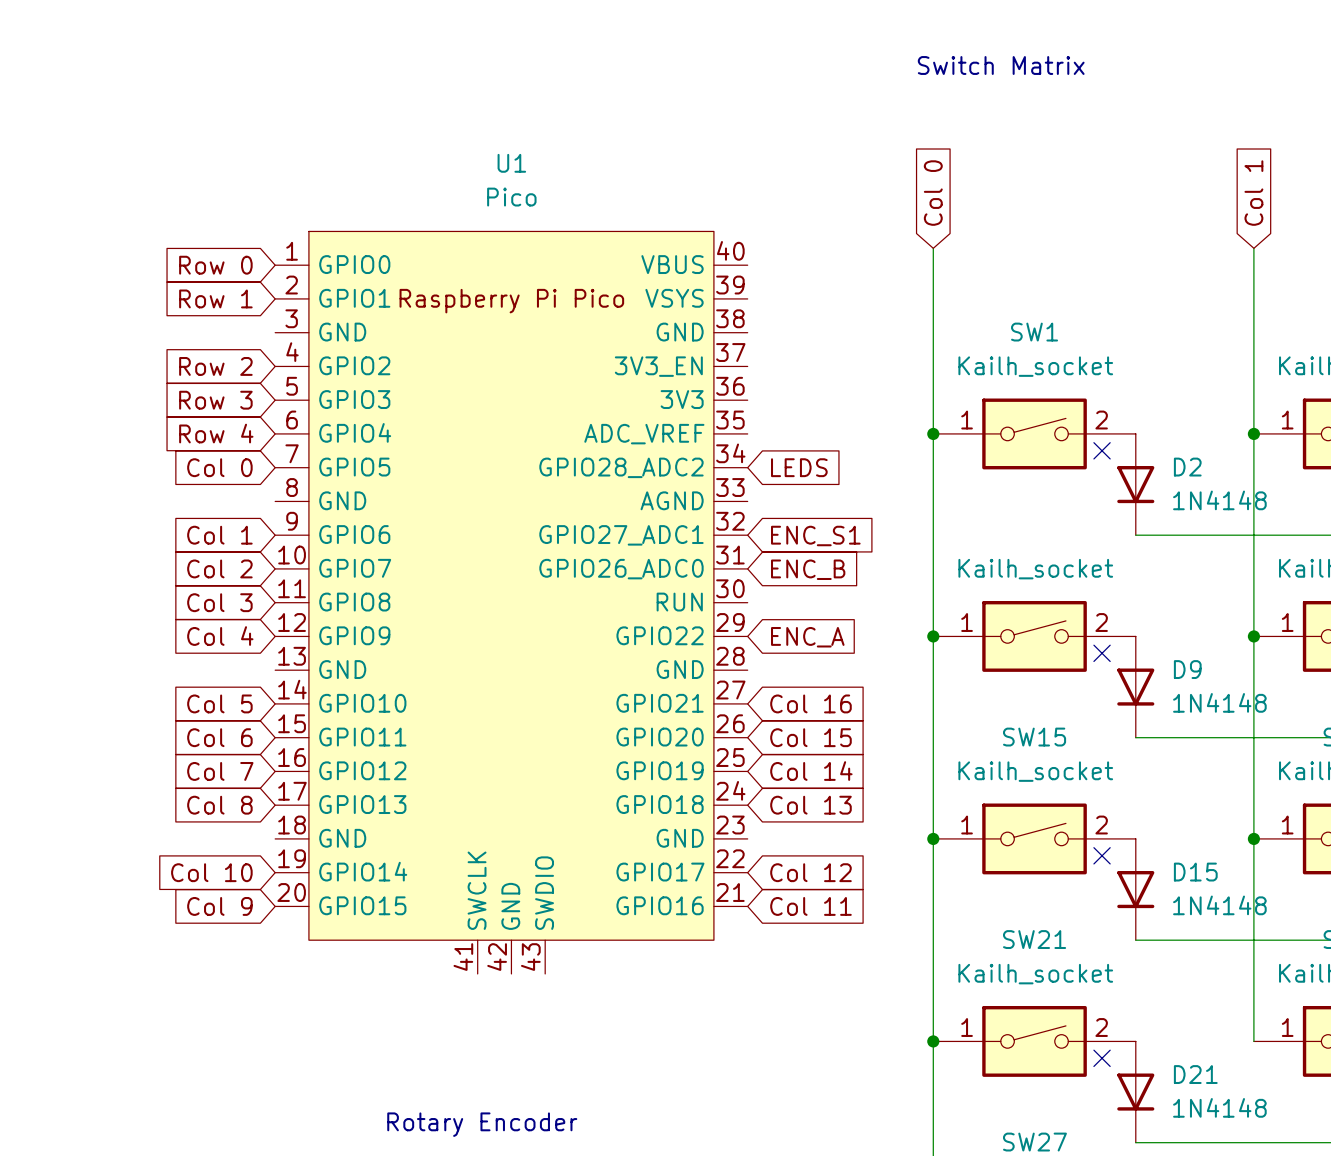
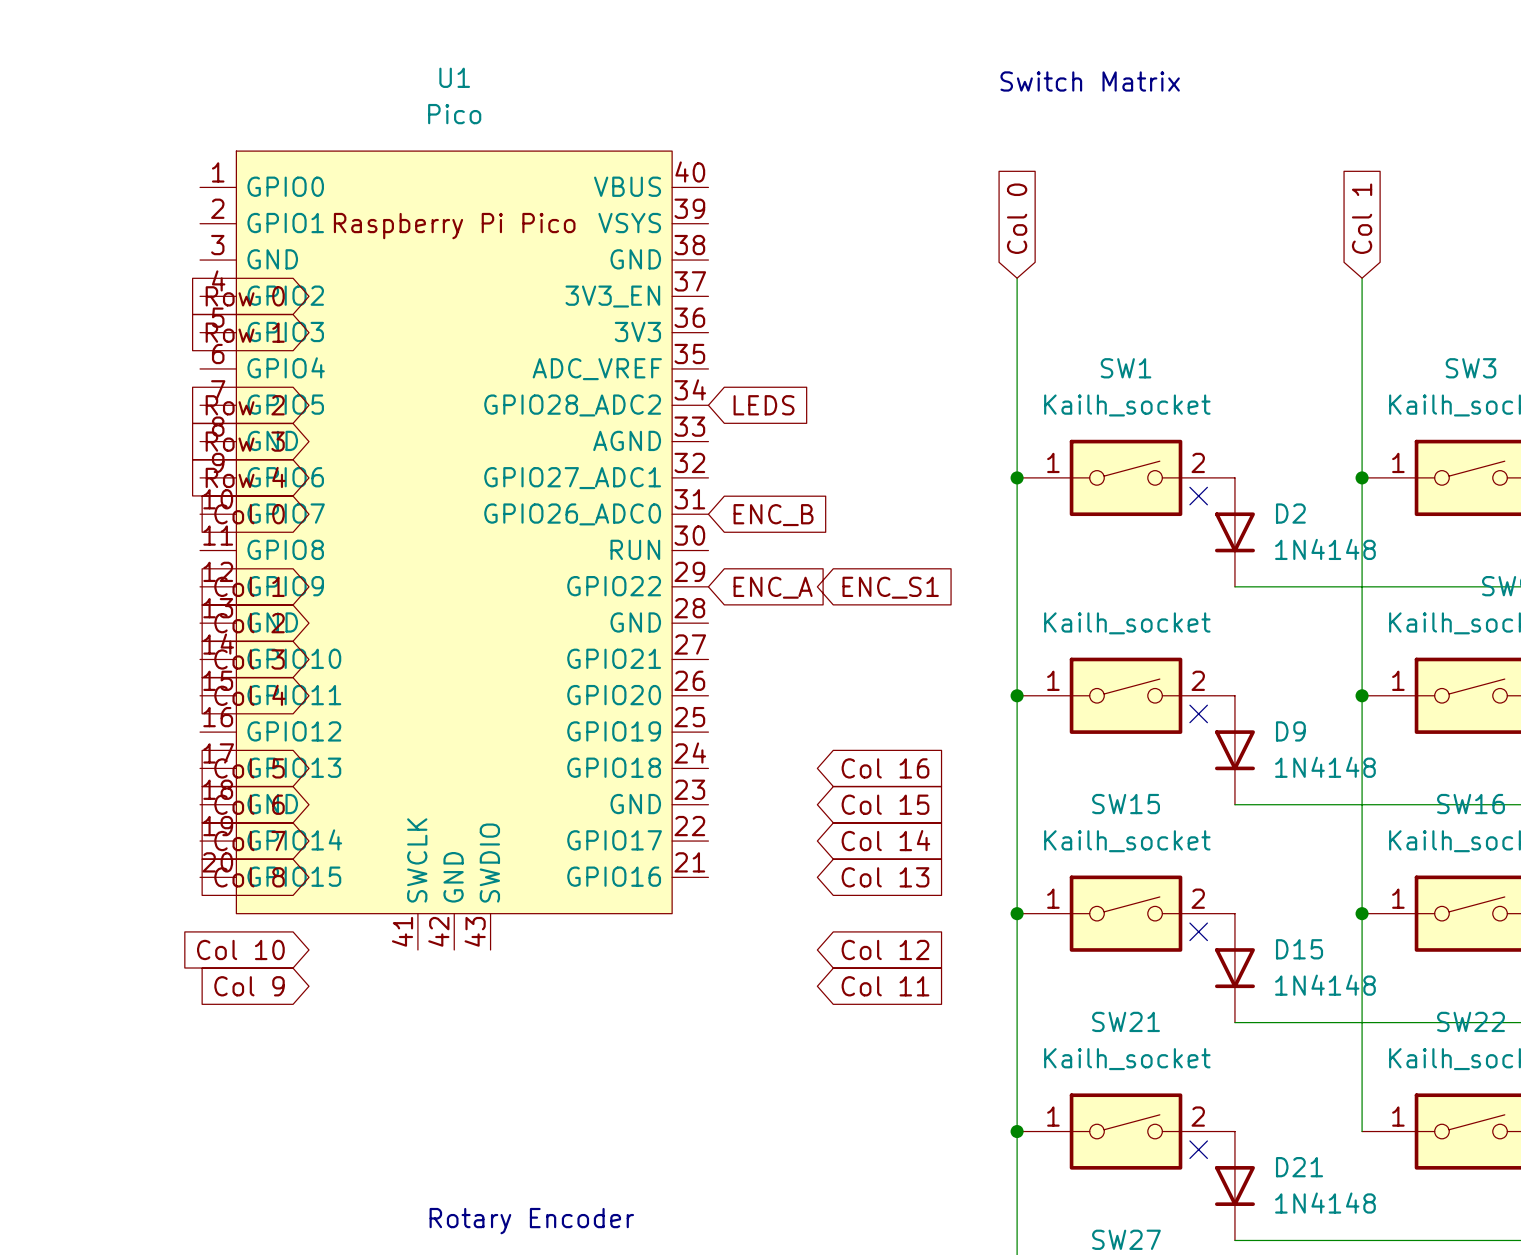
global label position: LEDS (799, 467) -> LEDS (764, 405)
global label position: ENC_B (808, 569) -> ENC_B (773, 515)
U1 position: (511, 602) -> (454, 550)
global label position: ENC_A (807, 637) -> ENC_A (773, 587)

